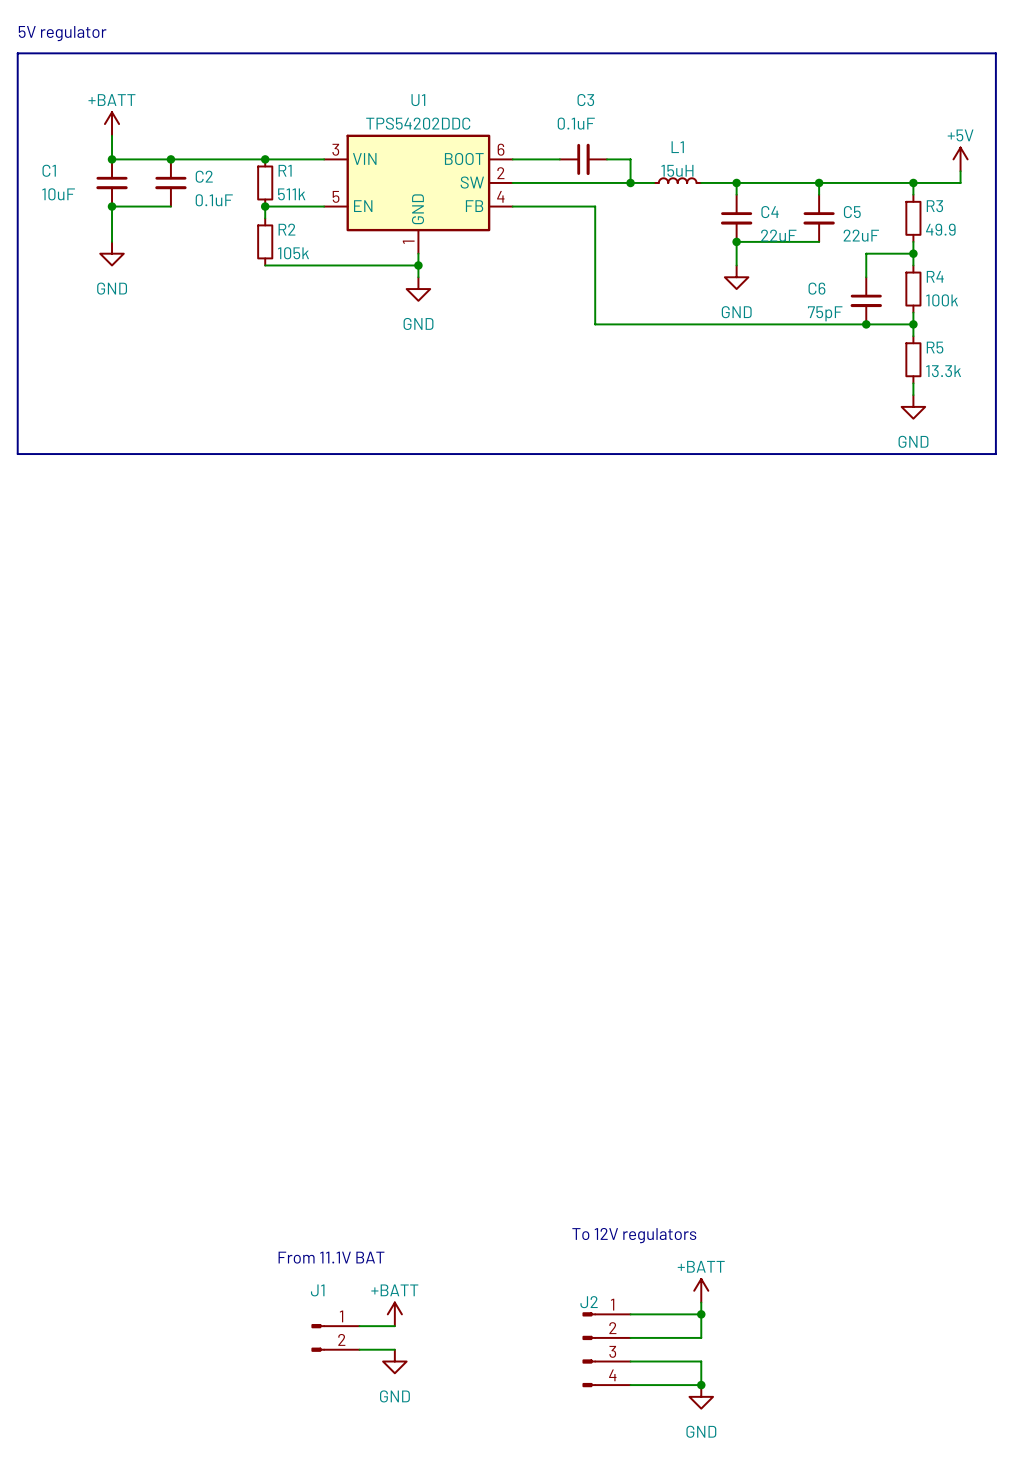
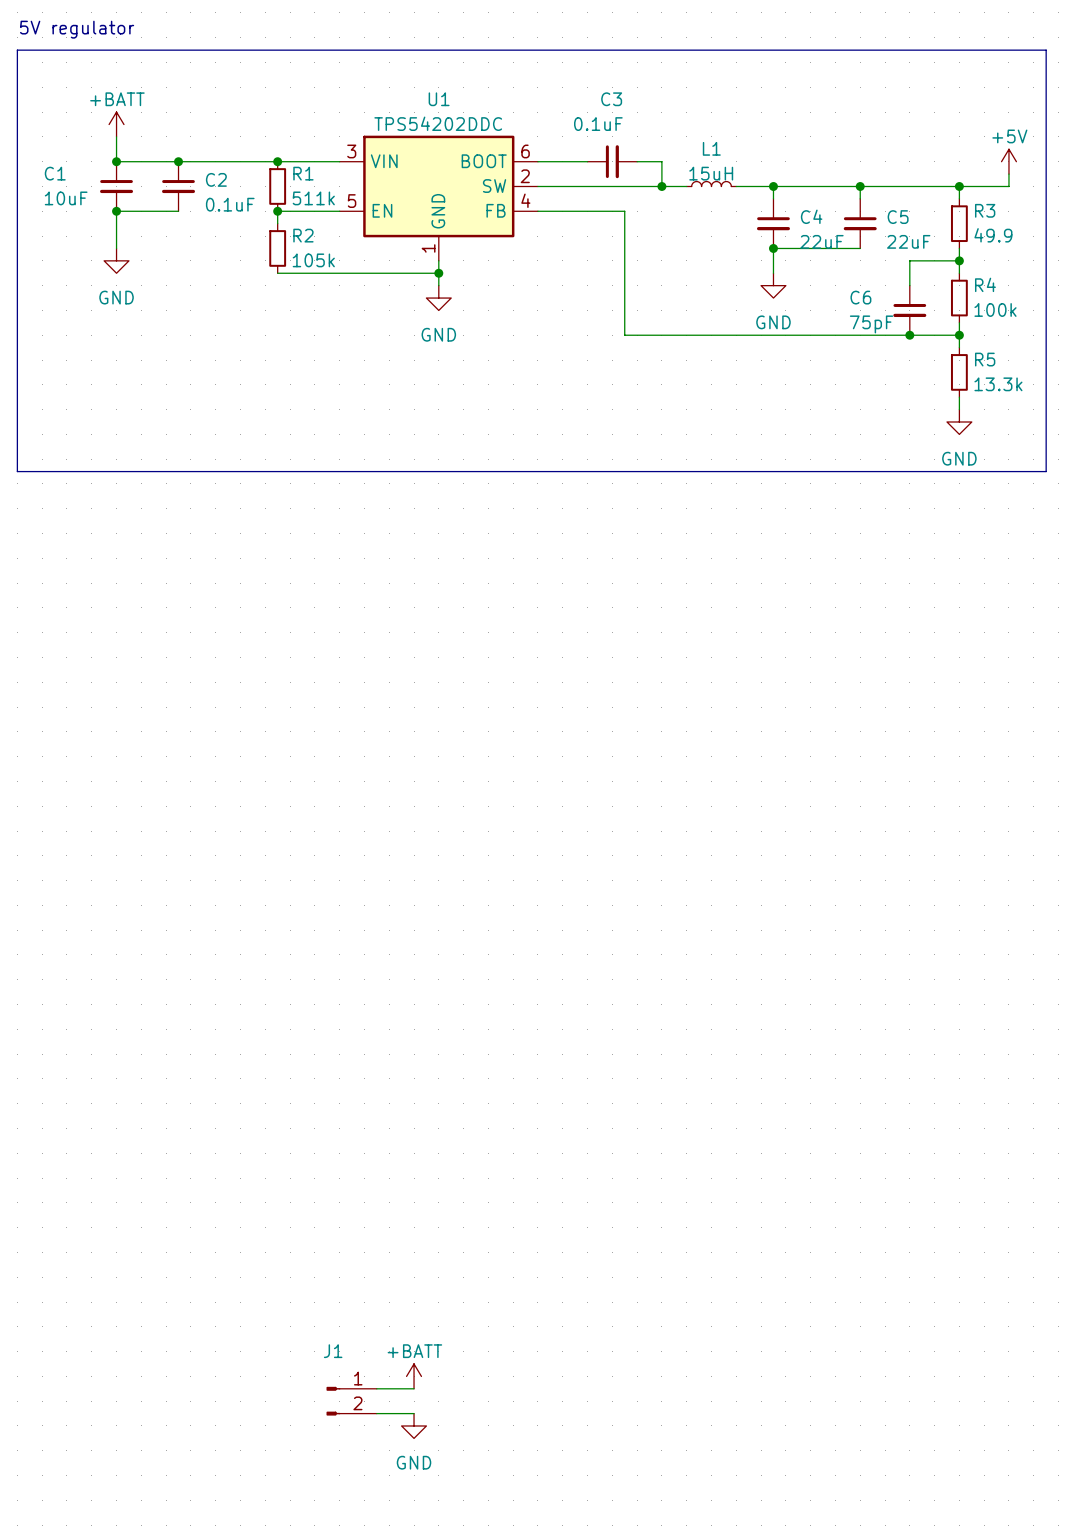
text: To 12V regulators (634, 1235) -> none
text: From 11.1V BAT (331, 1257) -> none
power symbol: +BATT (701, 1290) -> none
wire: (701, 1302) (701, 1337) (630, 1337) -> none
wire: (630, 1314) (701, 1314) -> none
junction: (701, 1314) -> none
J2: (606, 1349) -> none
wire: (630, 1361) (701, 1361) (701, 1385) (630, 1385) -> none
junction: (701, 1385) -> none
power symbol: GND (701, 1396) -> none

